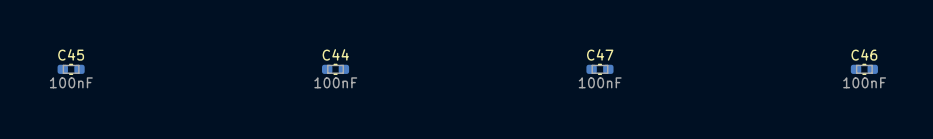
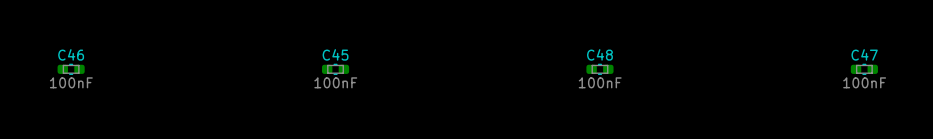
C45 name: C45 (71, 54) -> C46 (71, 54)
C44 name: C44 (335, 54) -> C45 (335, 54)
C47 name: C47 (600, 54) -> C48 (599, 54)
C46 name: C46 (864, 54) -> C47 (864, 54)

